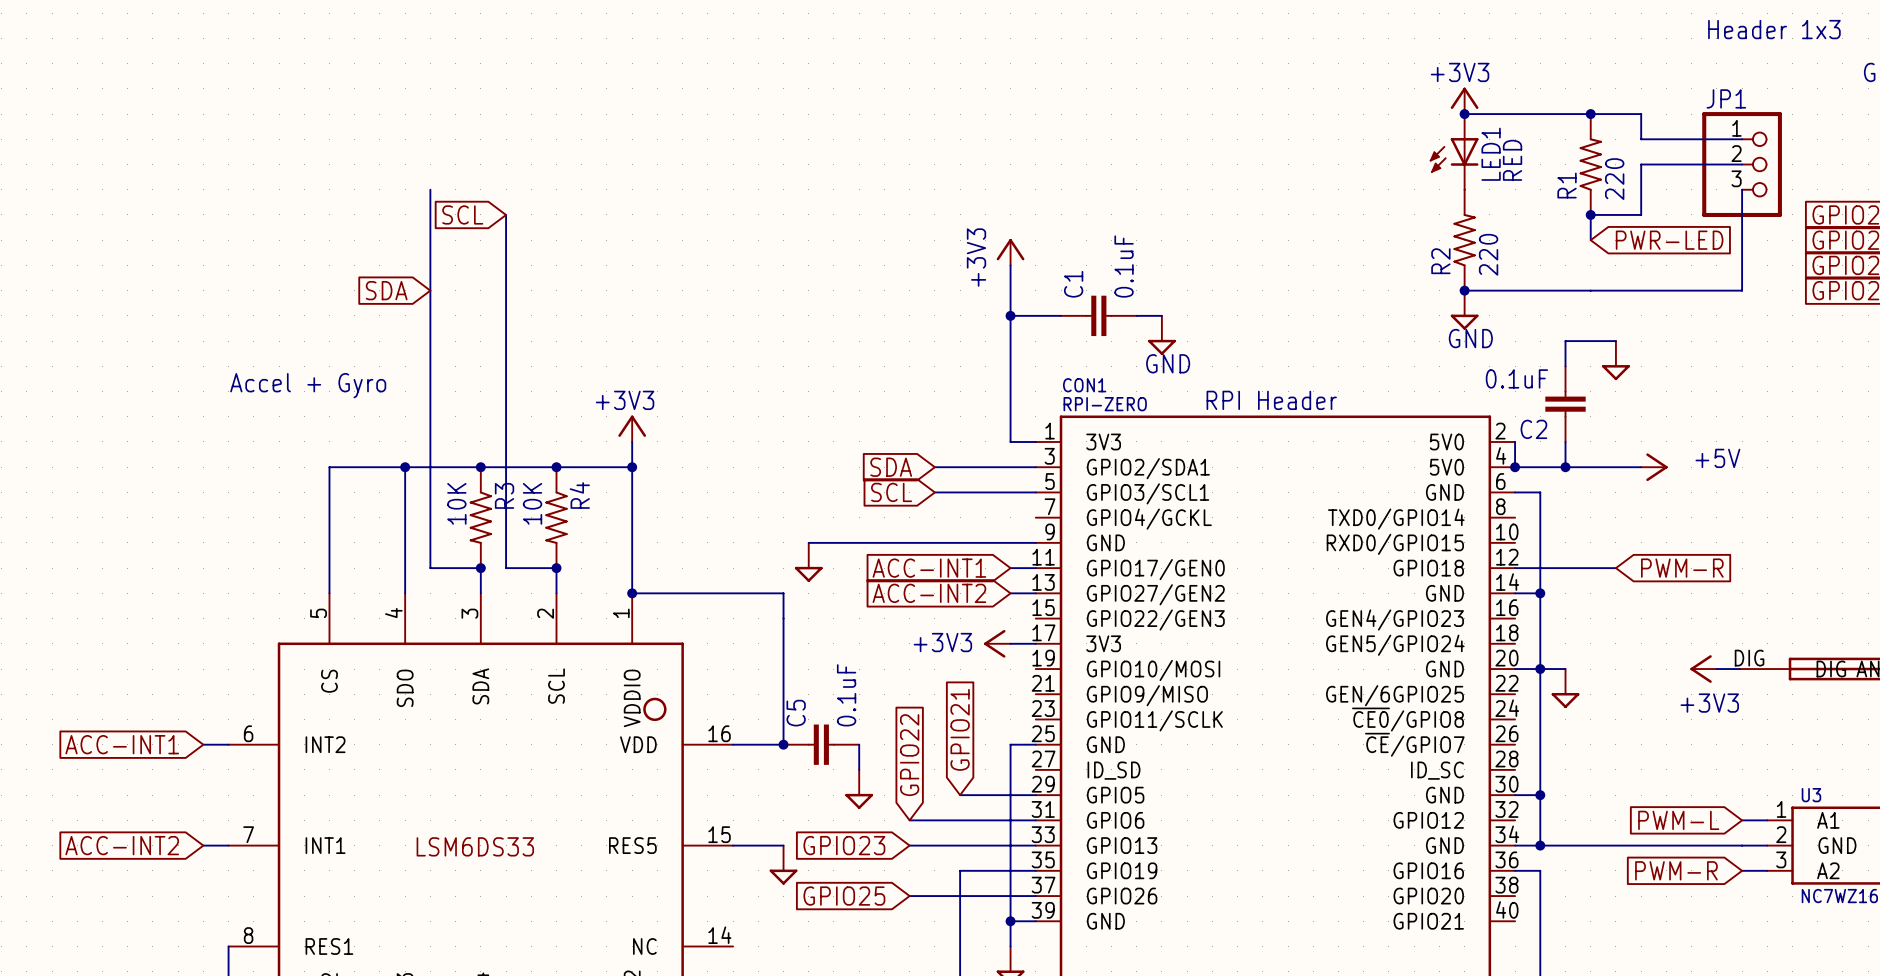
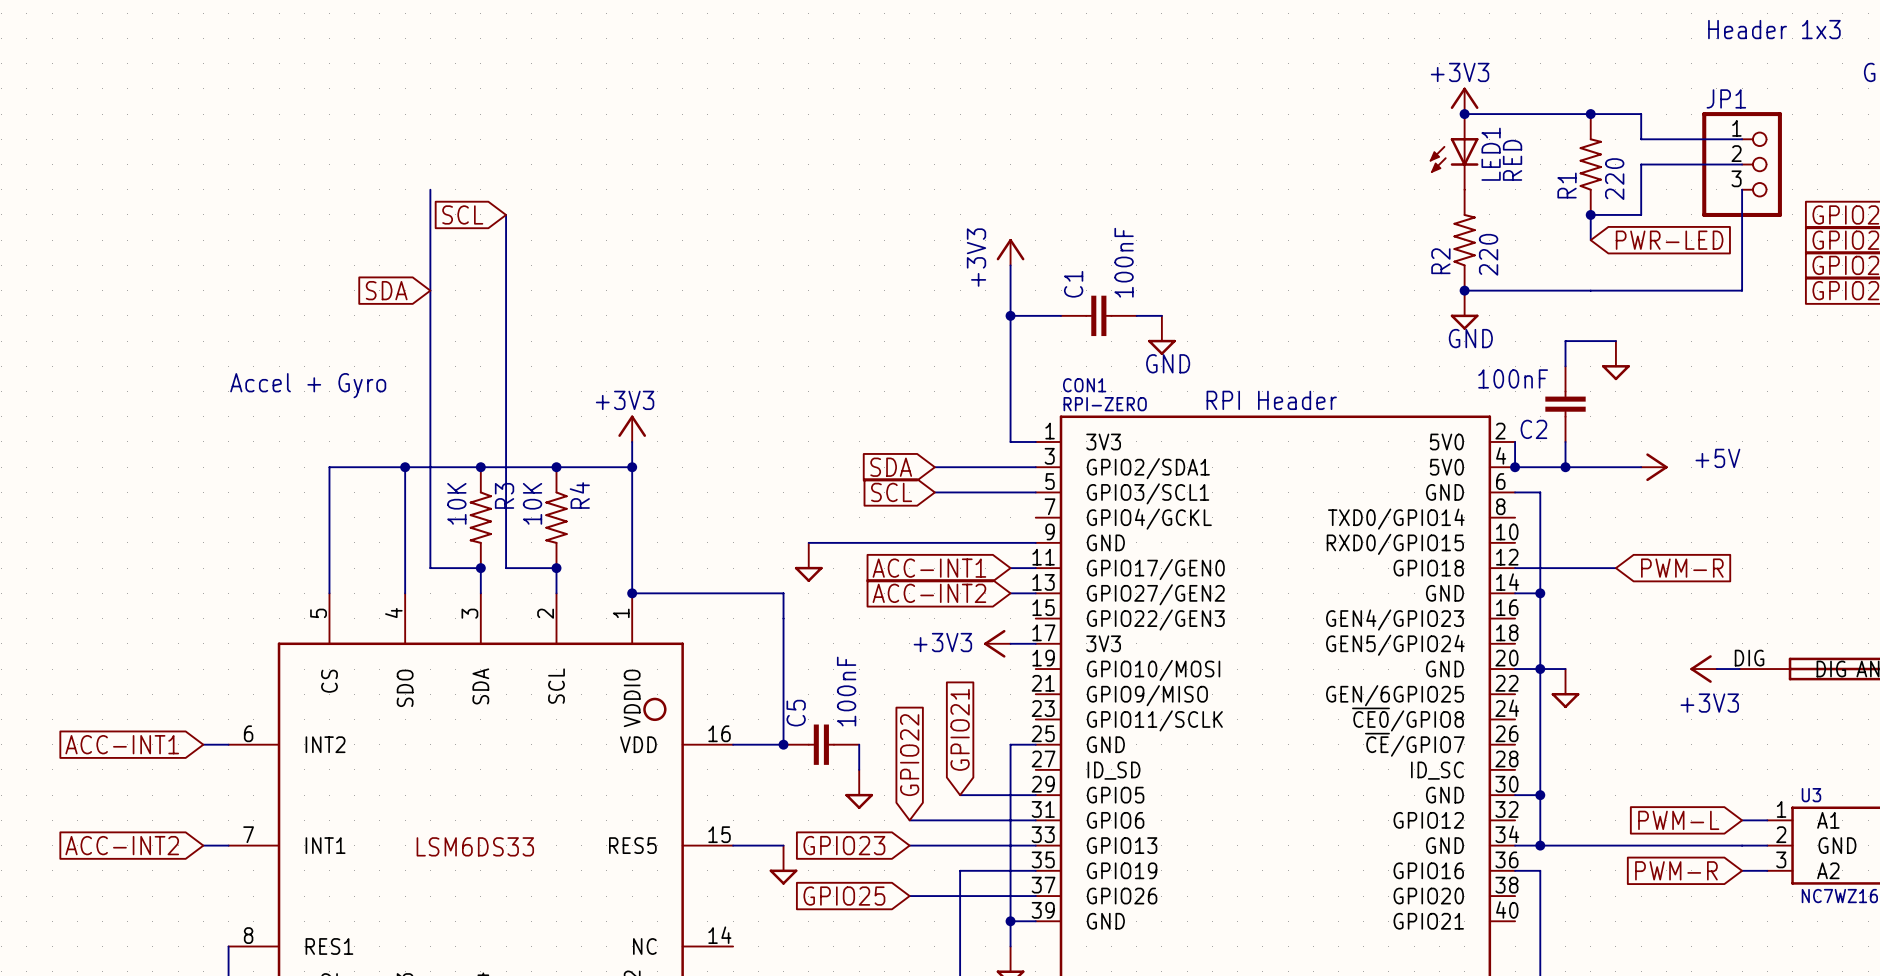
C1 value: 0.1uF (1124, 266) -> 100nF (1124, 262)
C2 value: 0.1uF (1516, 378) -> 100nF (1513, 378)
C5 value: 0.1uF (846, 695) -> 100nF (846, 691)

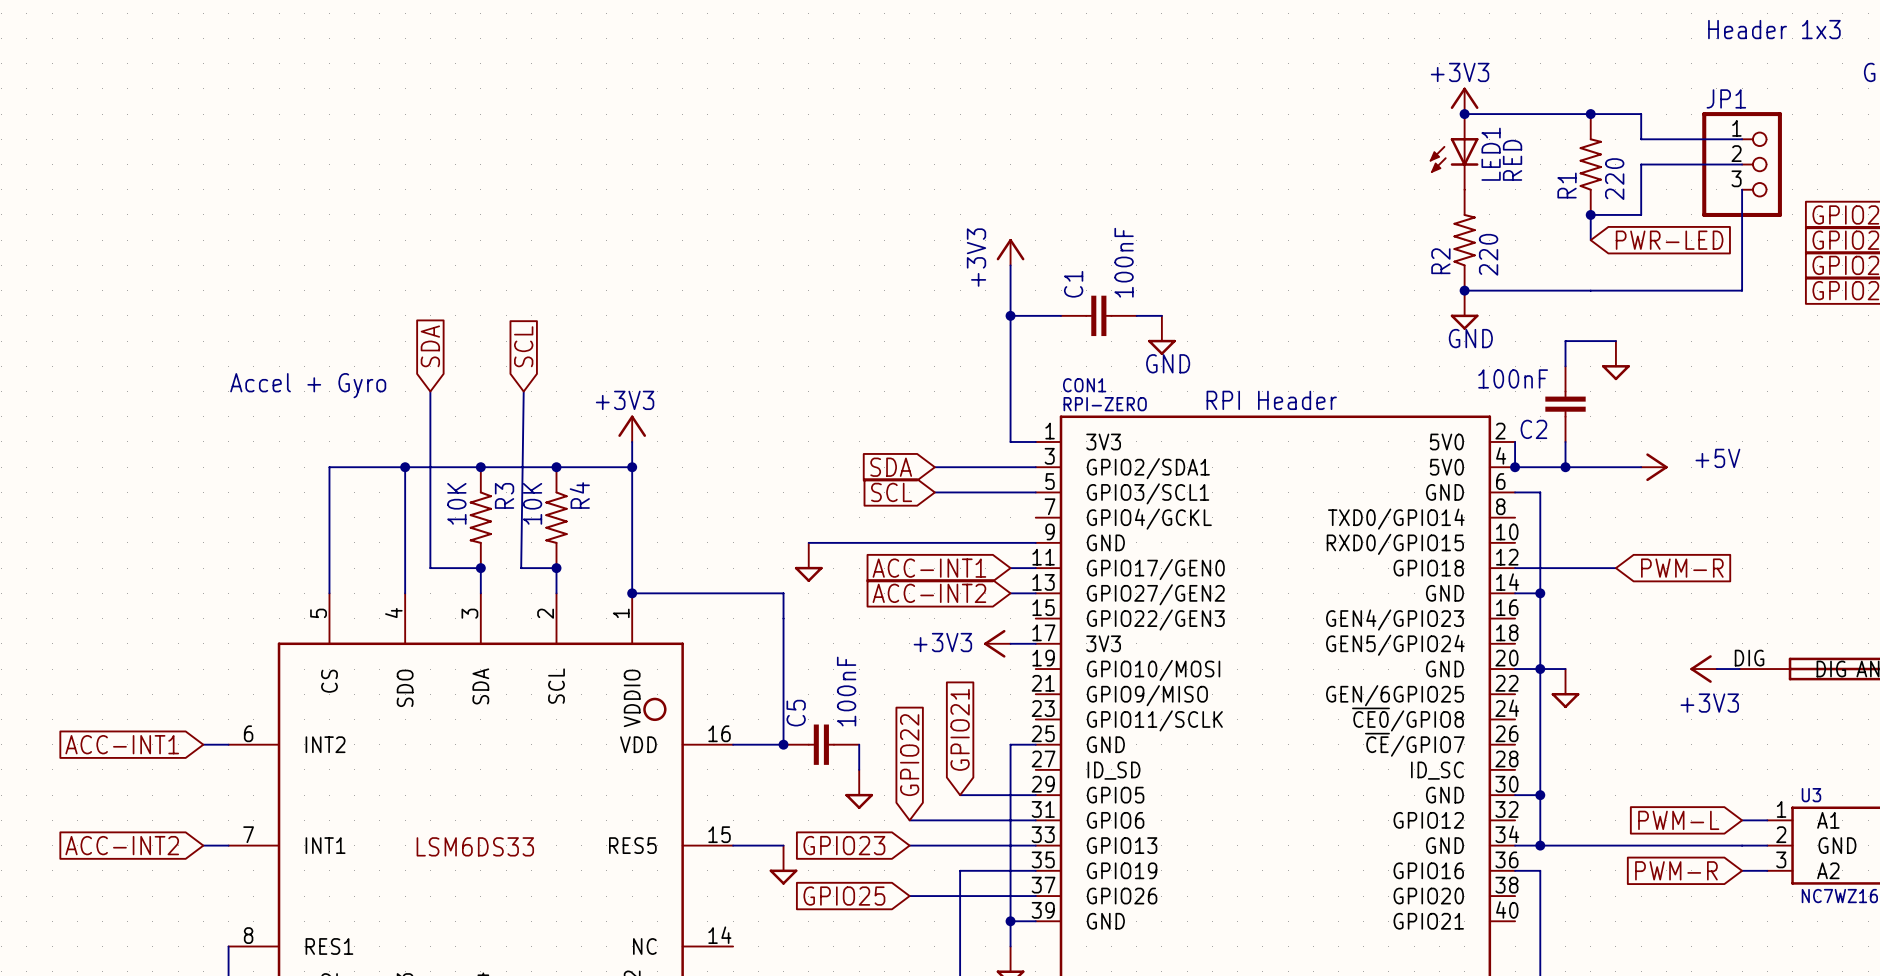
wire: (430, 189) (430, 391) -> none
global label rotation: 0° (462, 214) -> 90° clockwise (523, 346)
global label position: SCL (462, 214) -> SCL (523, 346)
wire: (506, 214) (506, 568) (521, 568) -> (523, 391) (521, 568)
global label rotation: 0° (386, 290) -> 90° clockwise (430, 346)

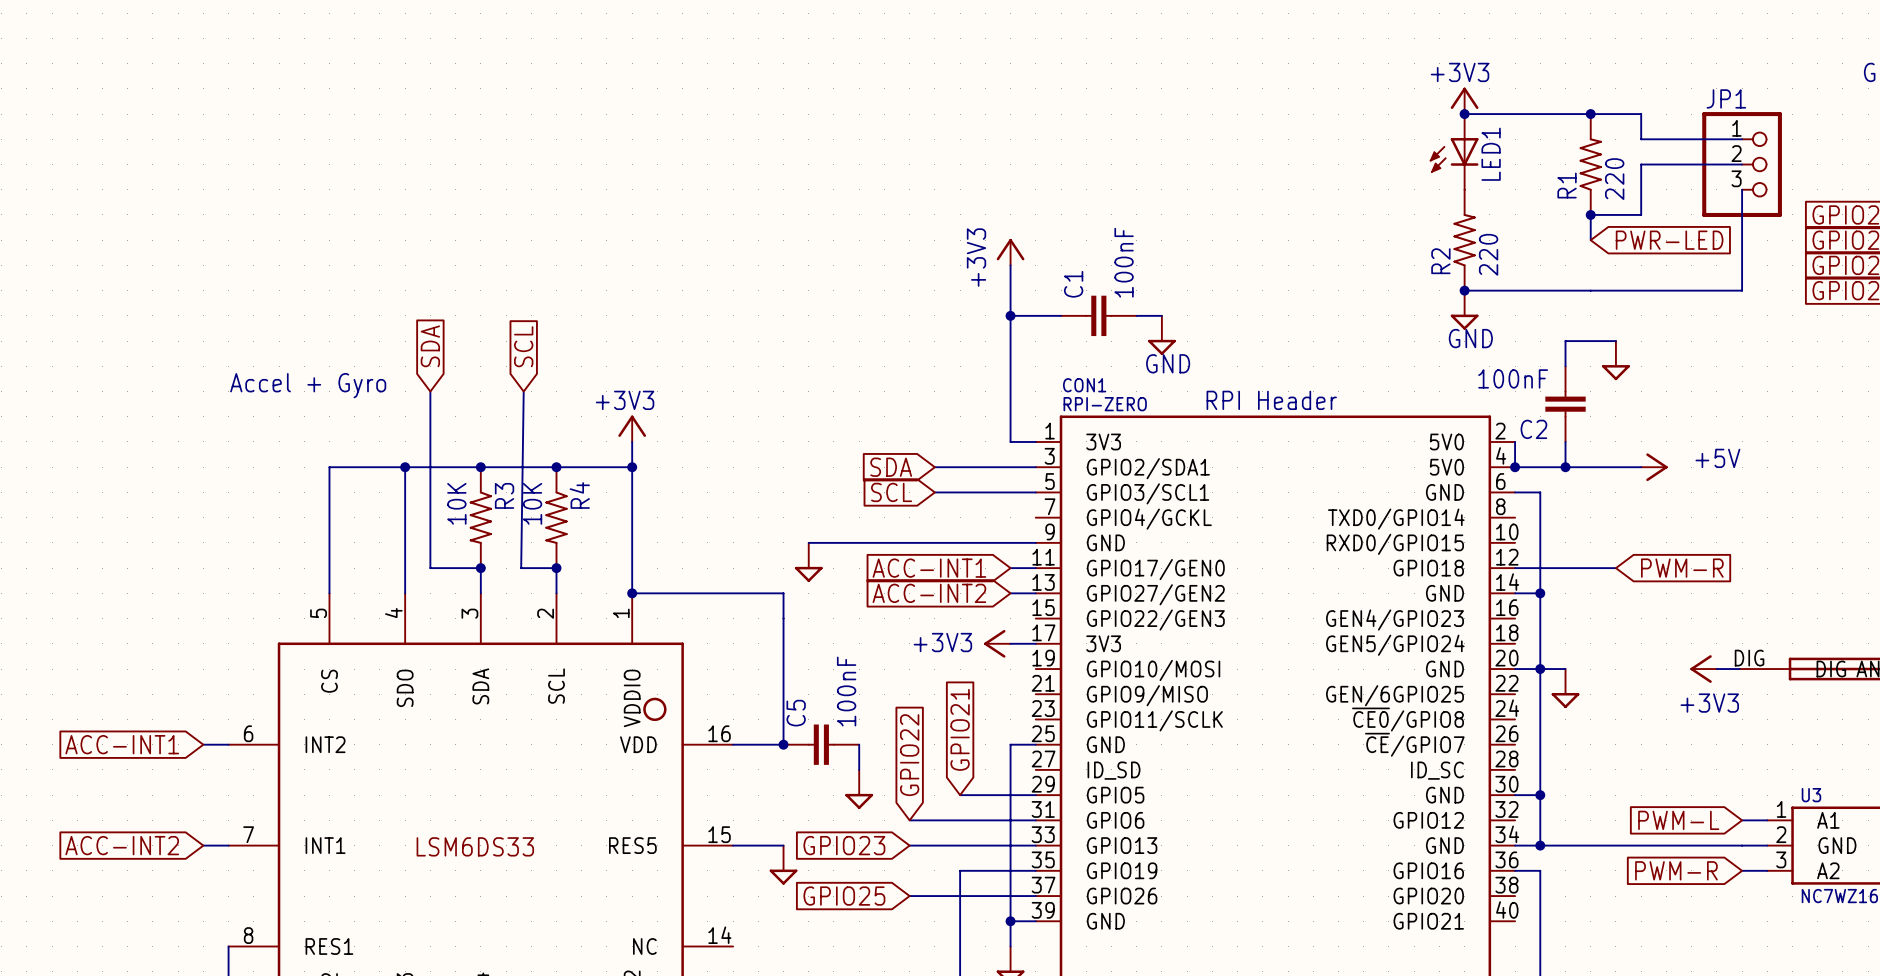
JP1 value: Header 1x3 (1774, 29) -> none
LED1 value: RED (1512, 160) -> none

